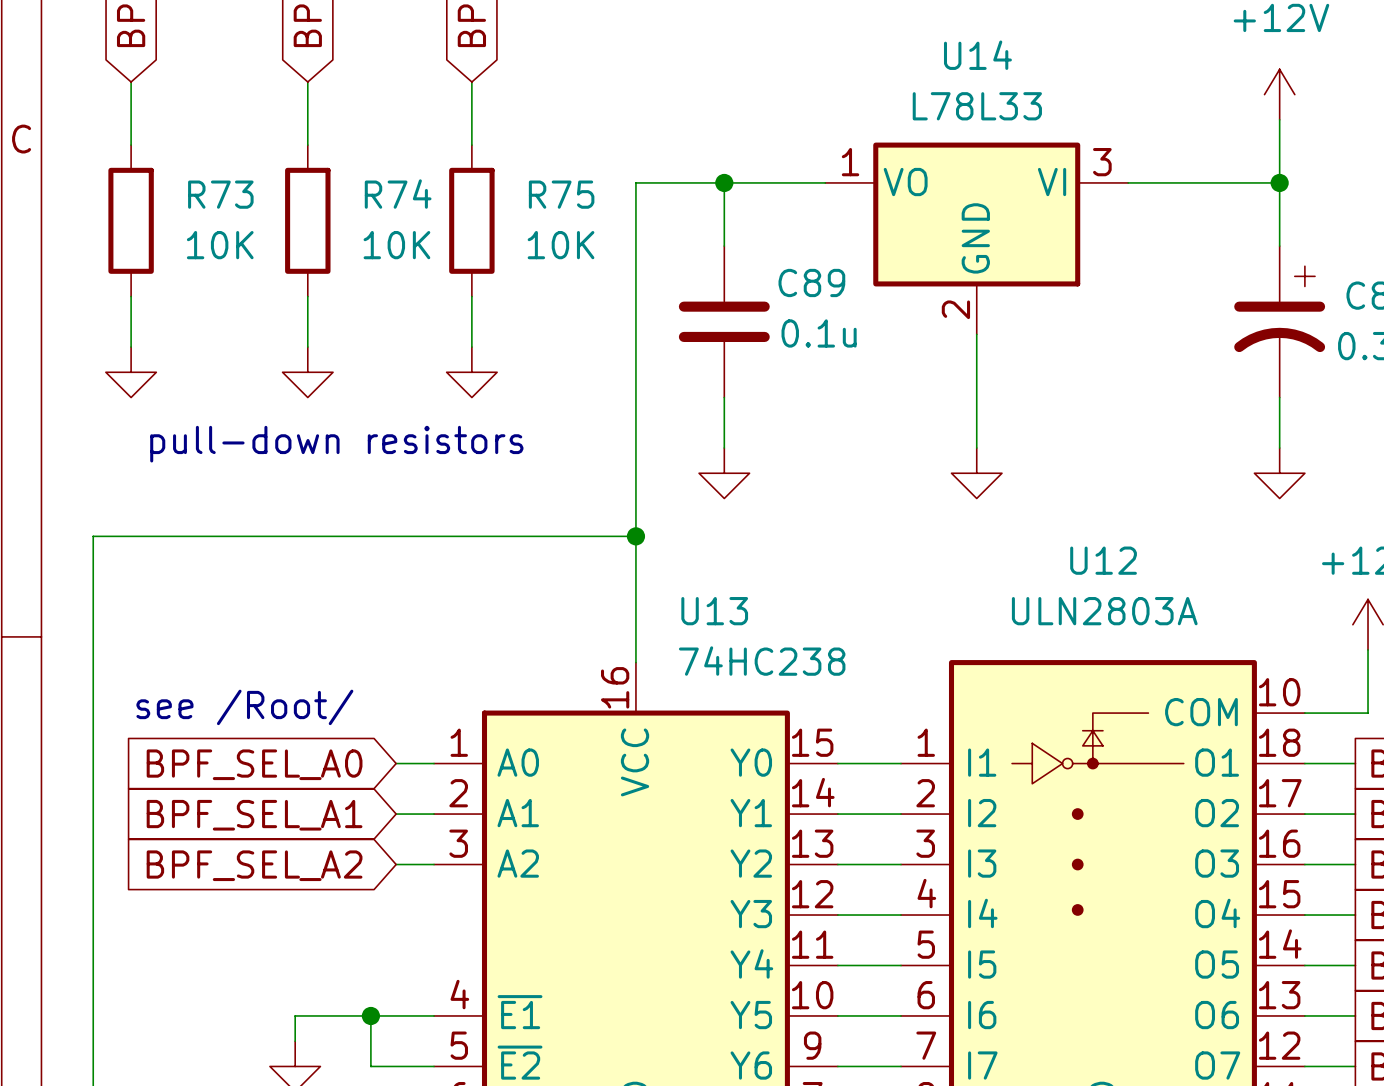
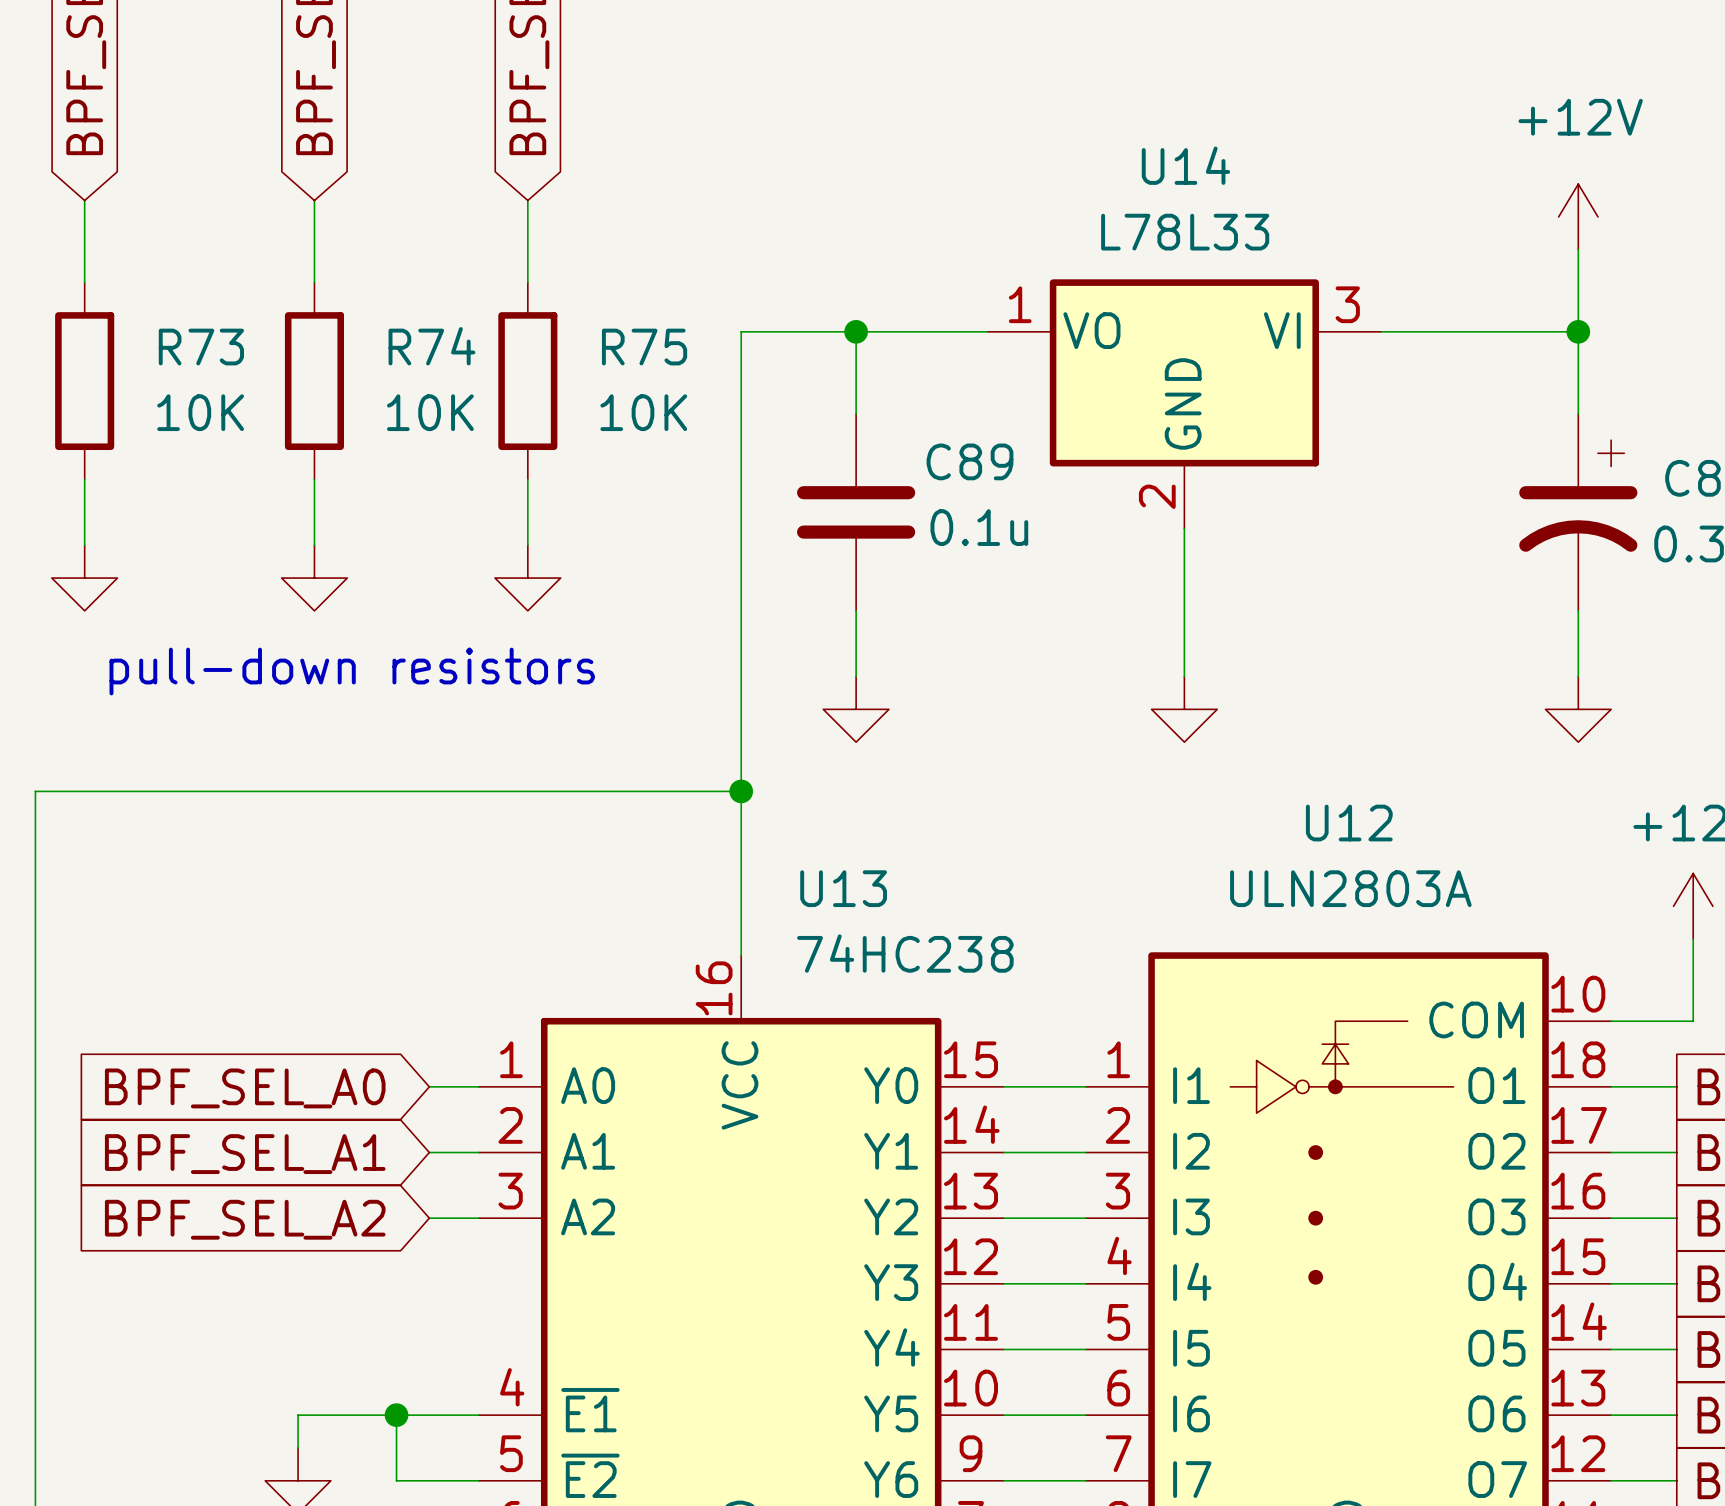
text: see /Root/ (244, 707) -> none

